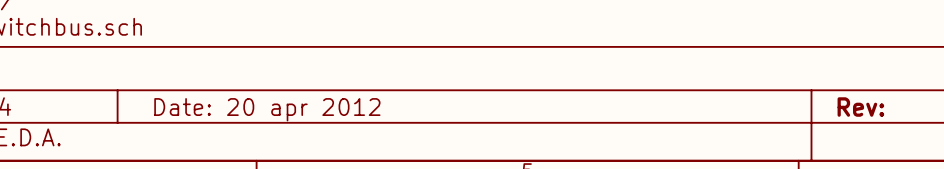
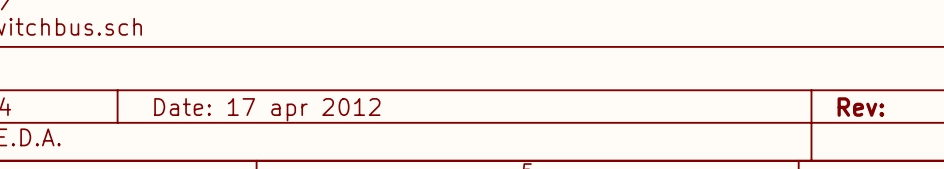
title block: Date: 20 apr 2012 (267, 109) -> Date: 17 apr 2012 (267, 109)

